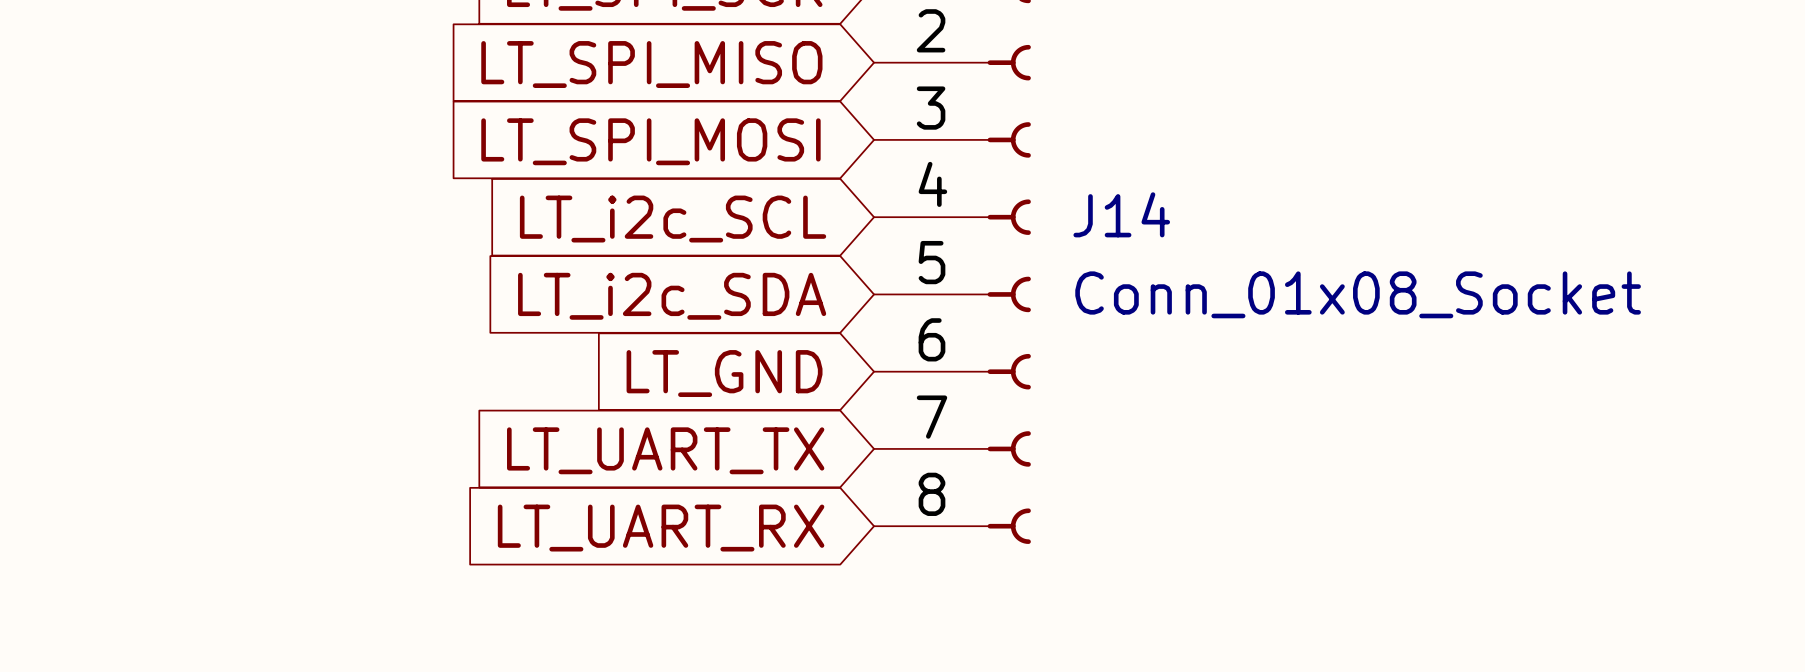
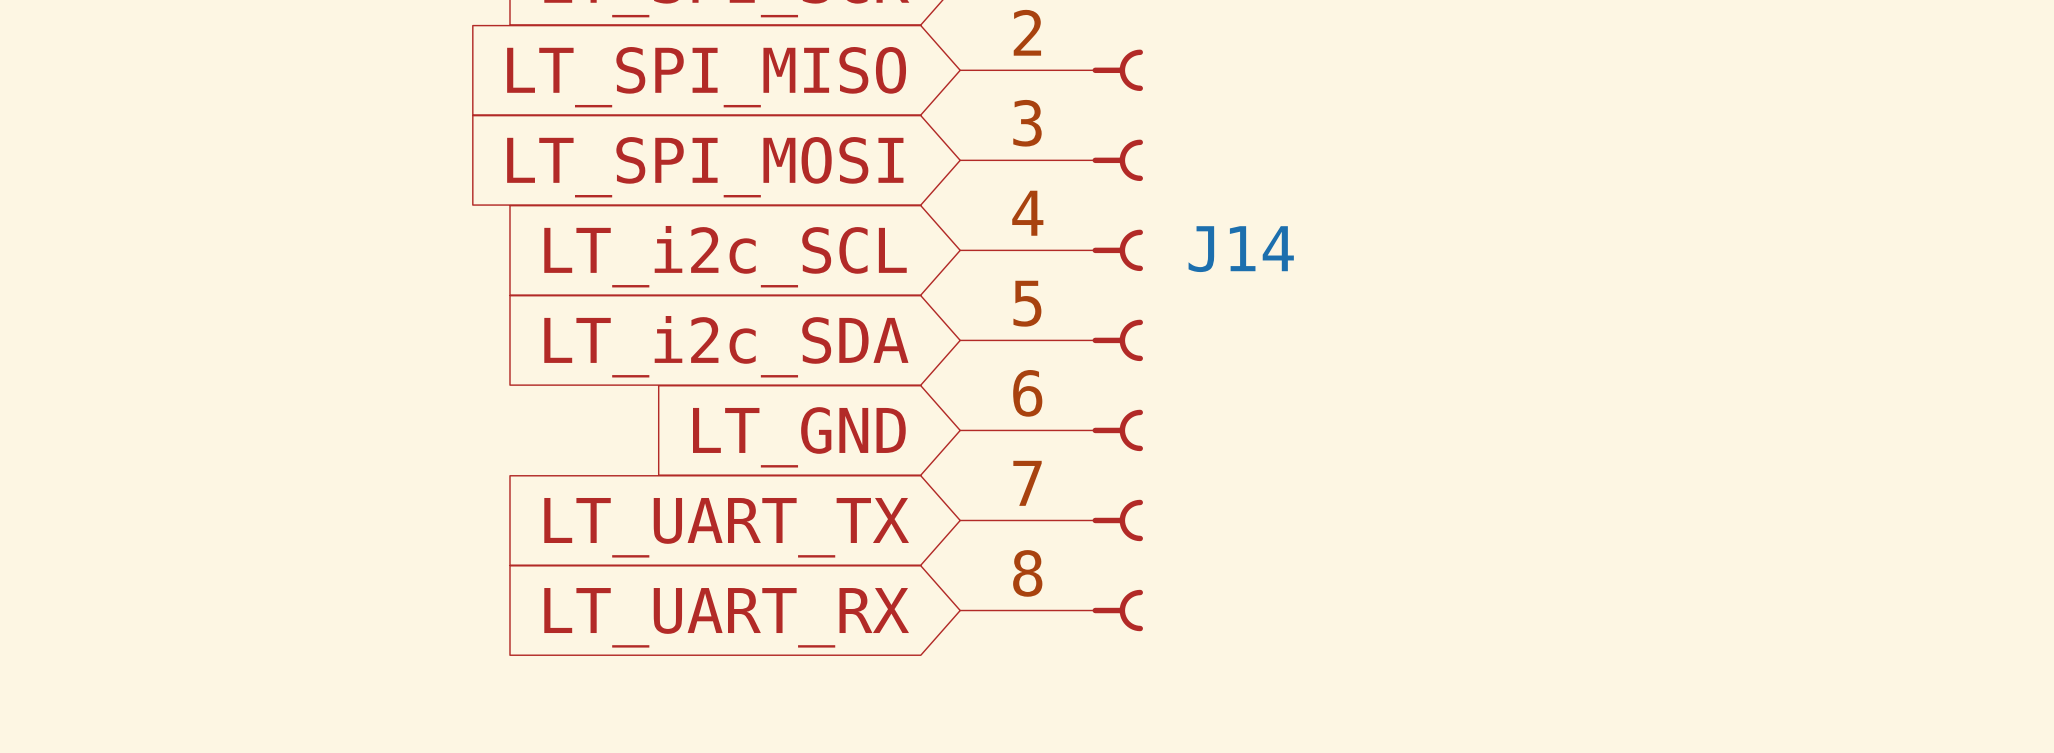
J14 value: Conn_01x08_Socket (1358, 294) -> none

